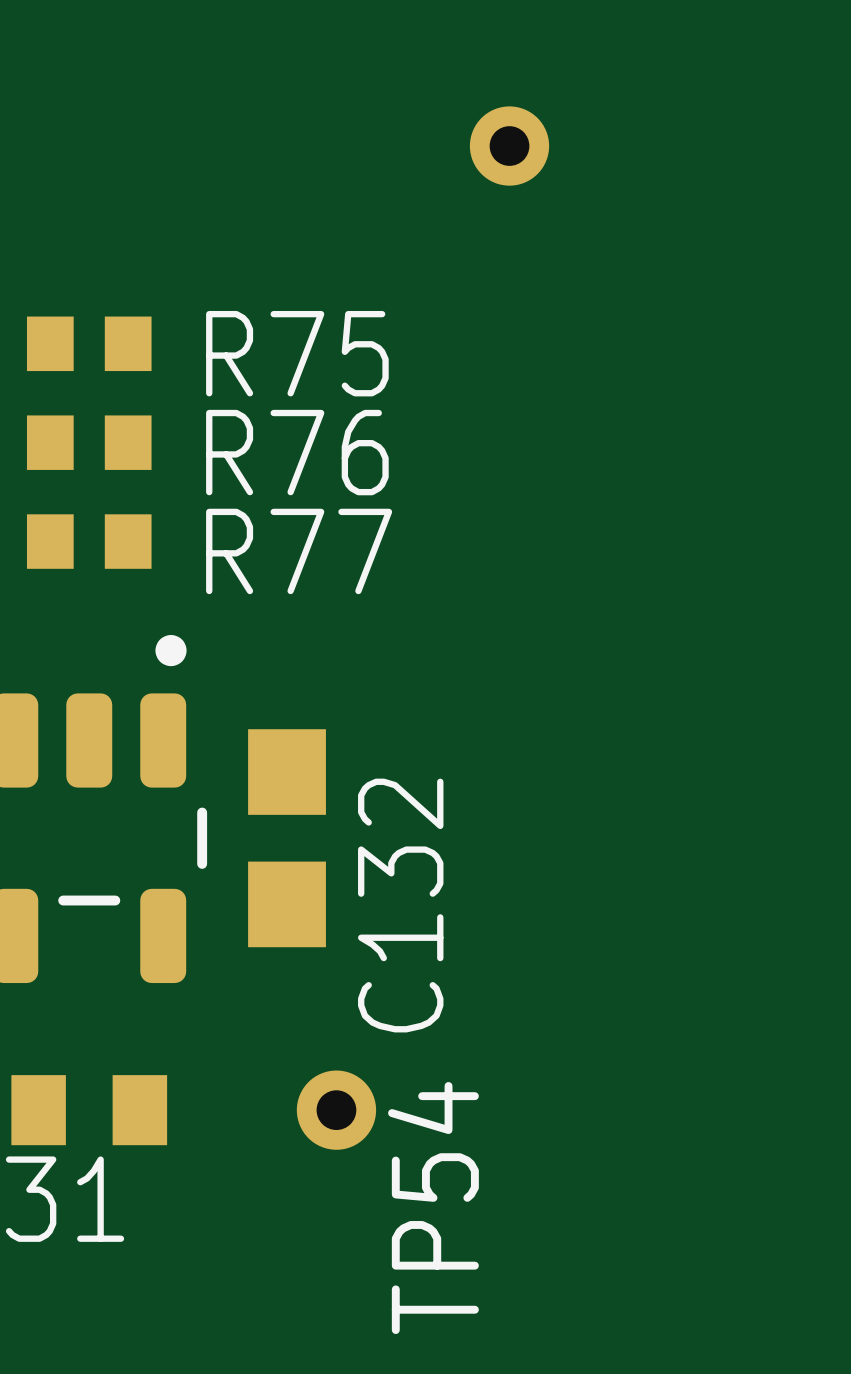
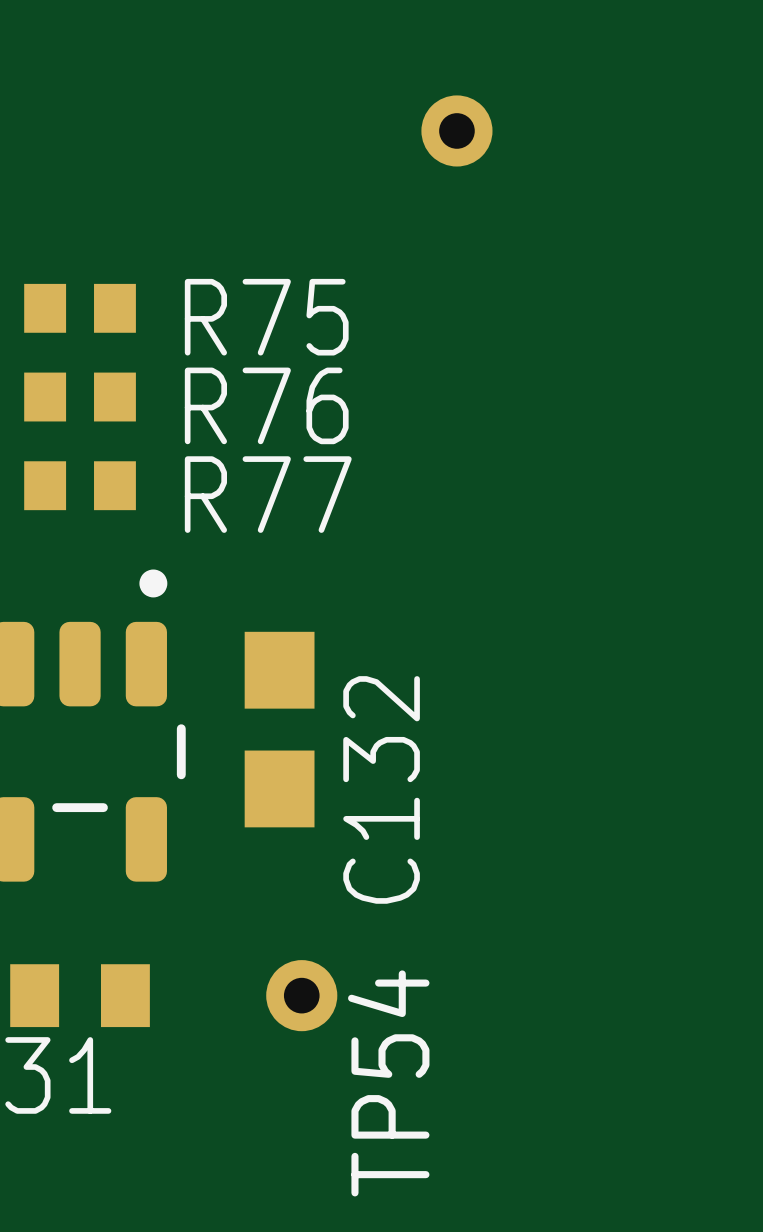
C132 position: (287, 838) -> (279, 729)

